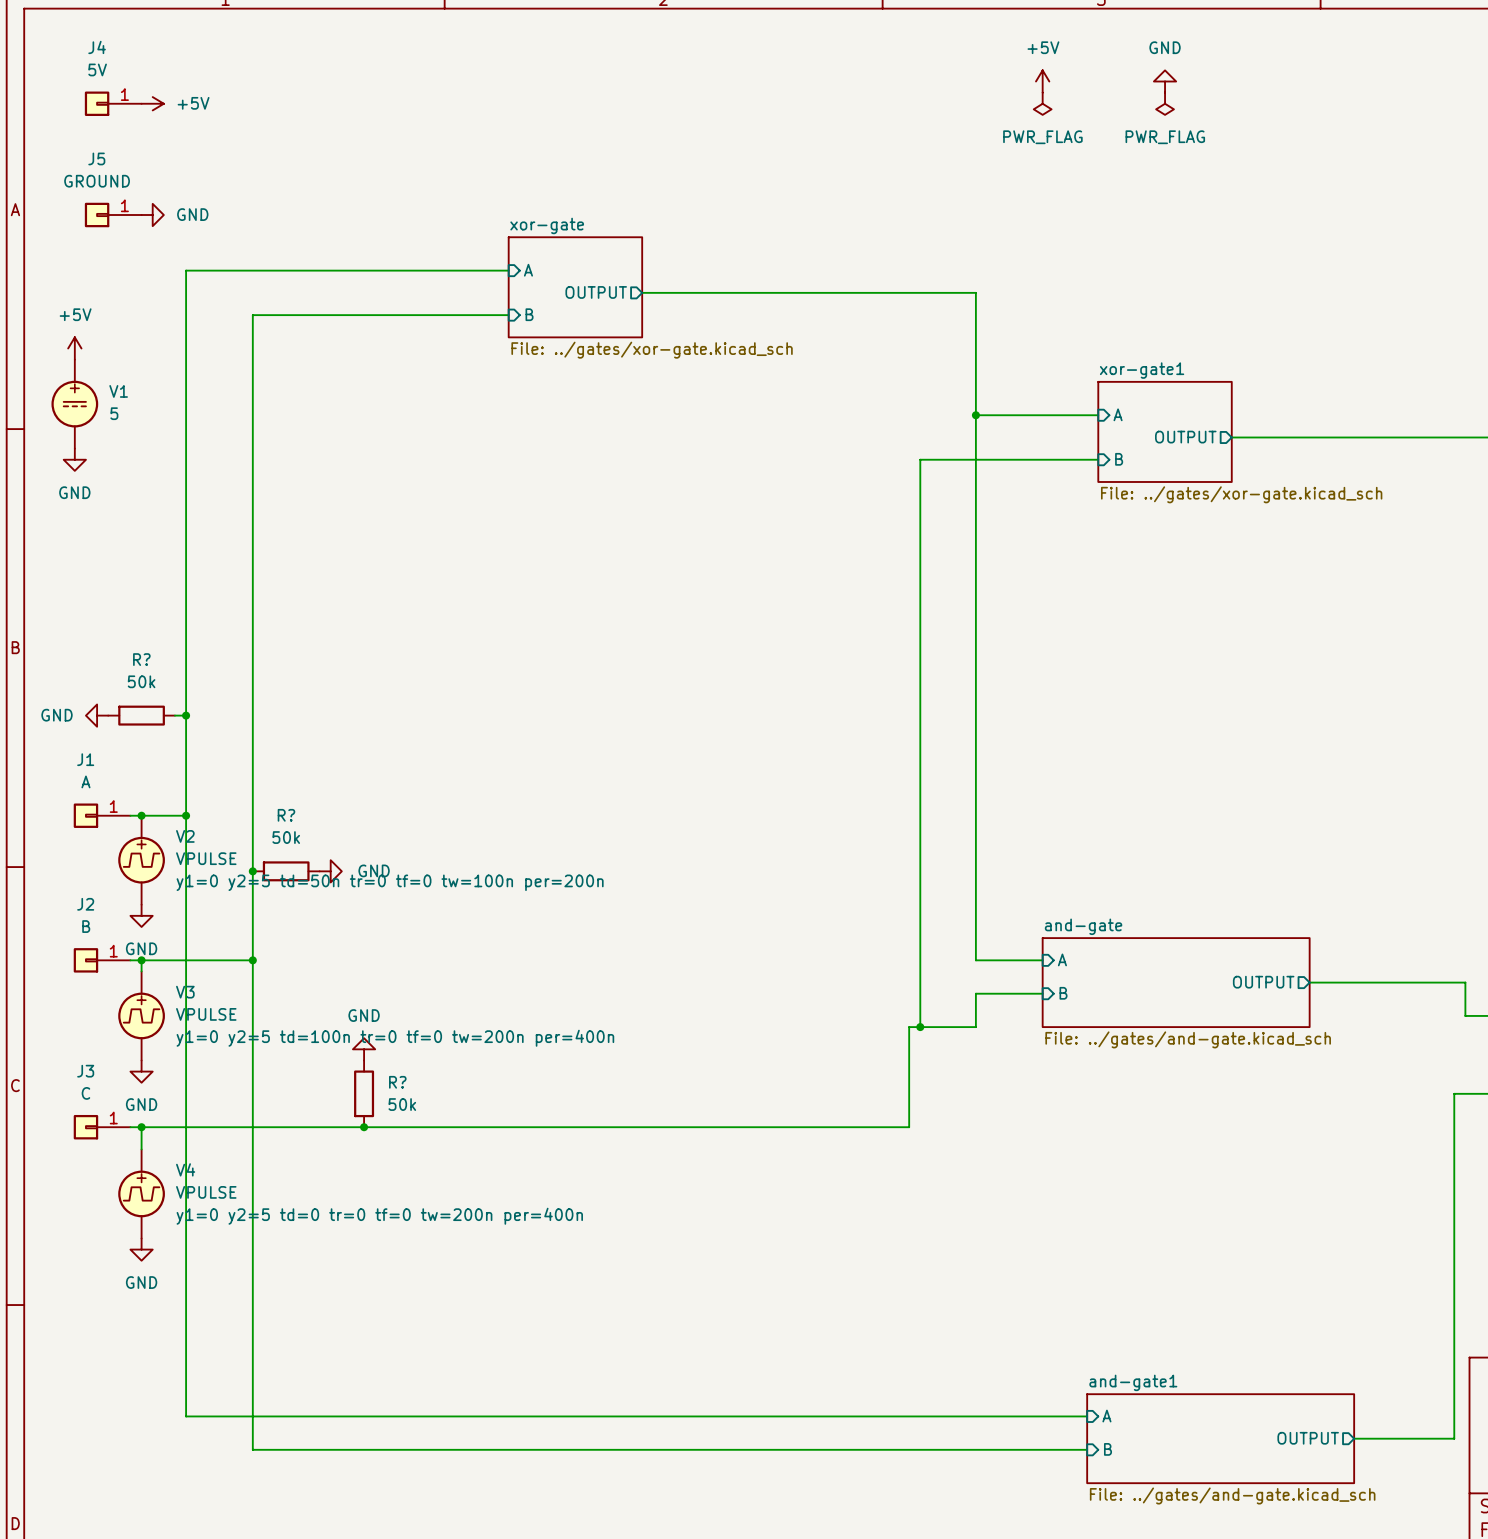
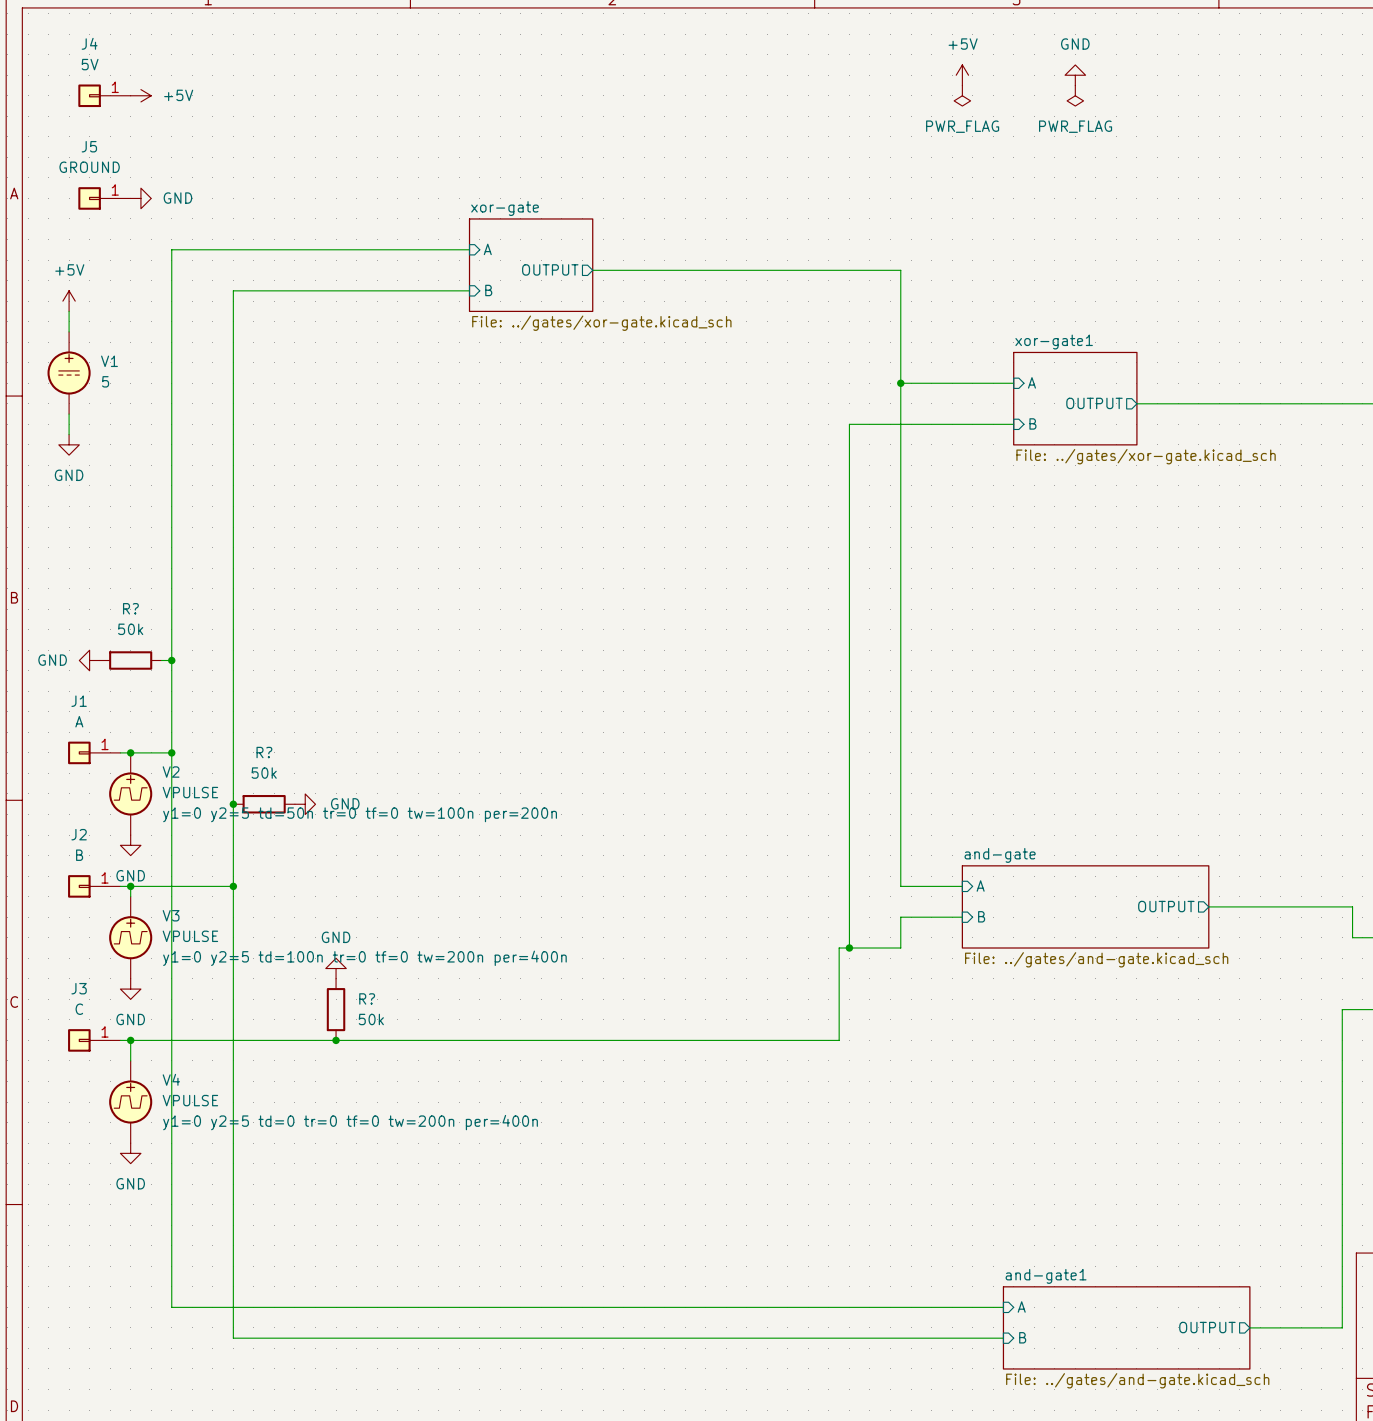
power symbol position: +5V (74, 348) -> +5V (69, 301)
power symbol position: GND (74, 459) -> GND (69, 444)

